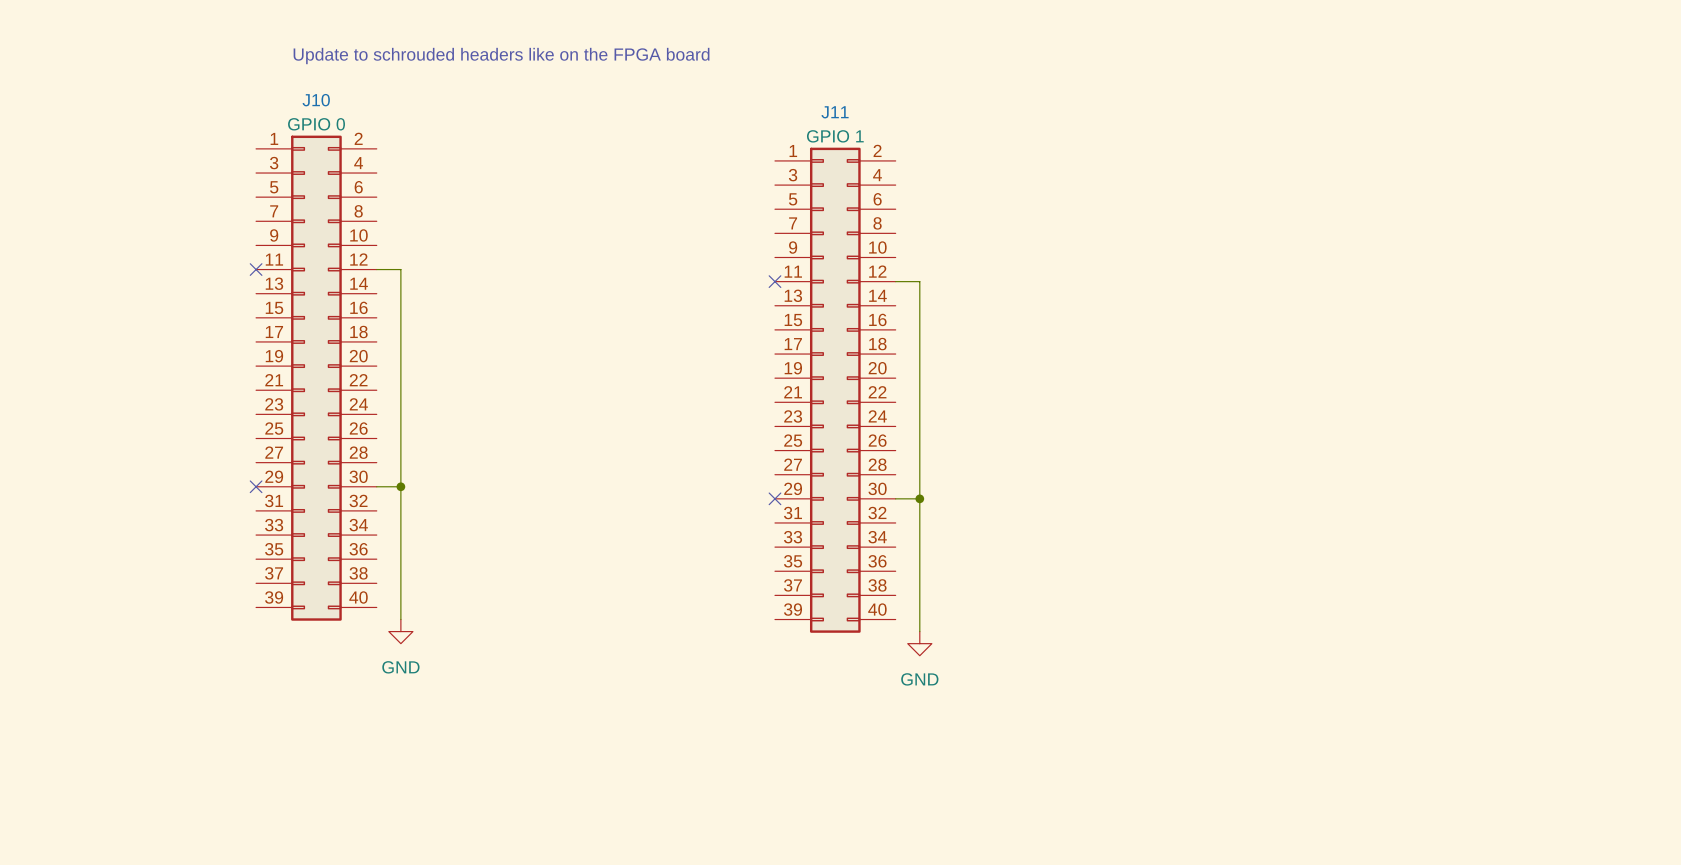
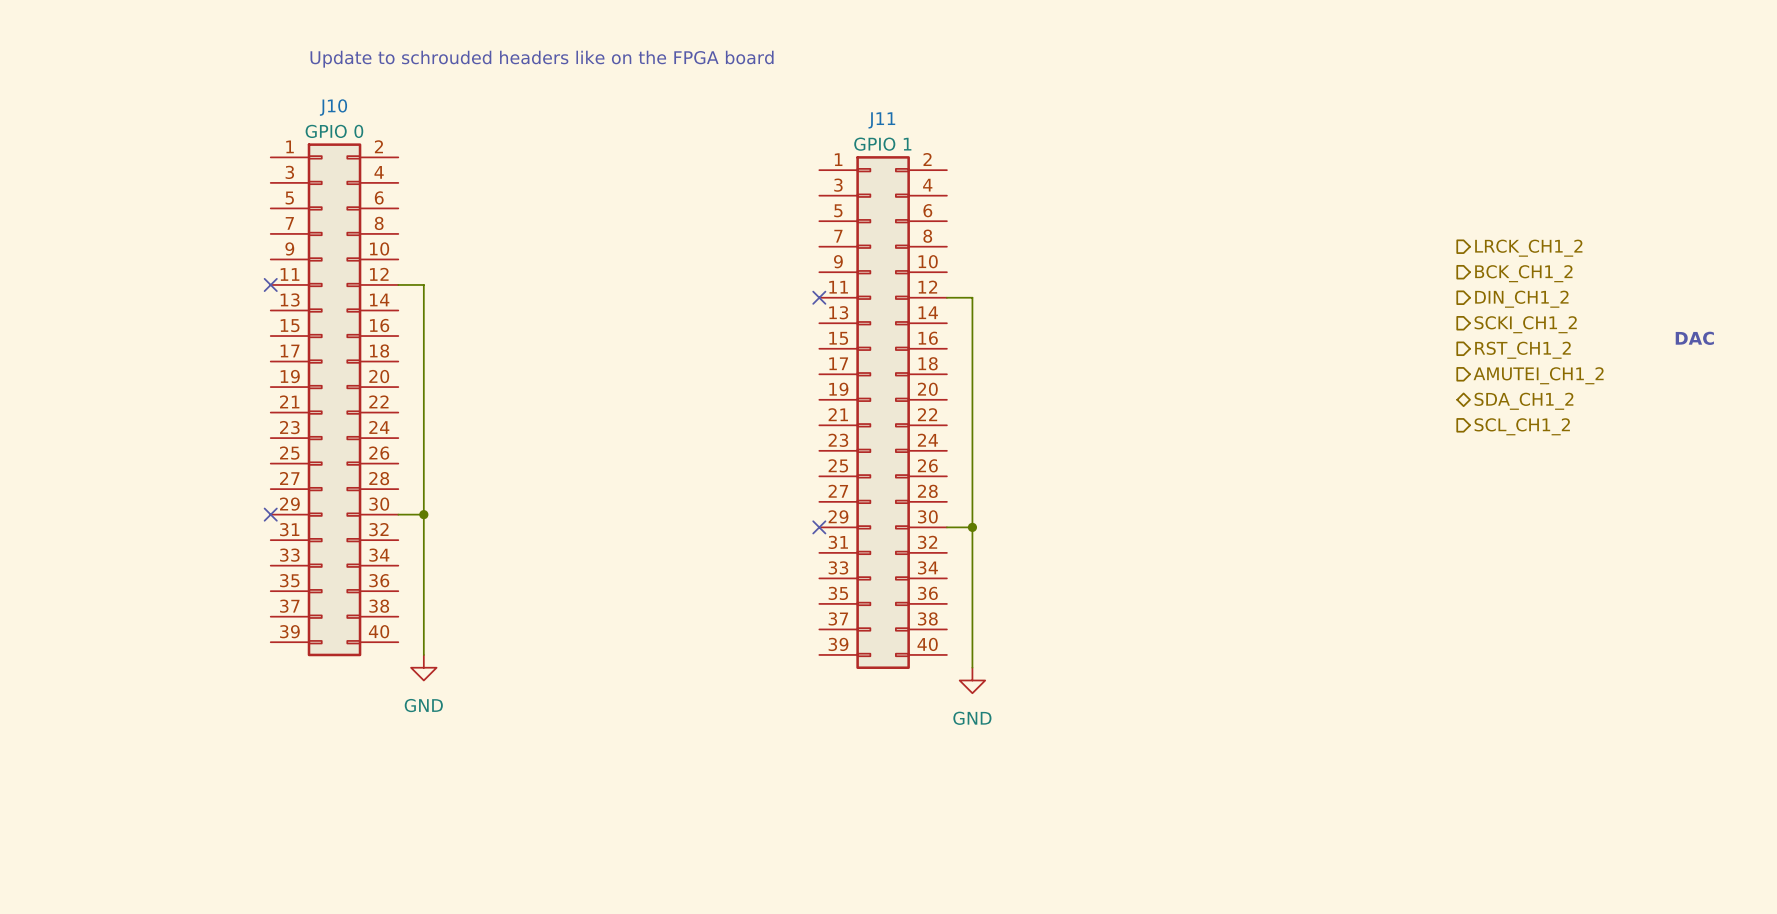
hierarchical label: none -> LRCK_CH1_2 (1528, 248)
hierarchical label: none -> BCK_CH1_2 (1523, 273)
hierarchical label: none -> DIN_CH1_2 (1521, 299)
hierarchical label: none -> SCKI_CH1_2 (1525, 324)
text: none -> DAC (1694, 338)
hierarchical label: none -> RST_CH1_2 (1522, 350)
hierarchical label: none -> AMUTEI_CH1_2 (1538, 375)
hierarchical label: none -> SDA_CH1_2 (1523, 401)
hierarchical label: none -> SCL_CH1_2 (1522, 426)

